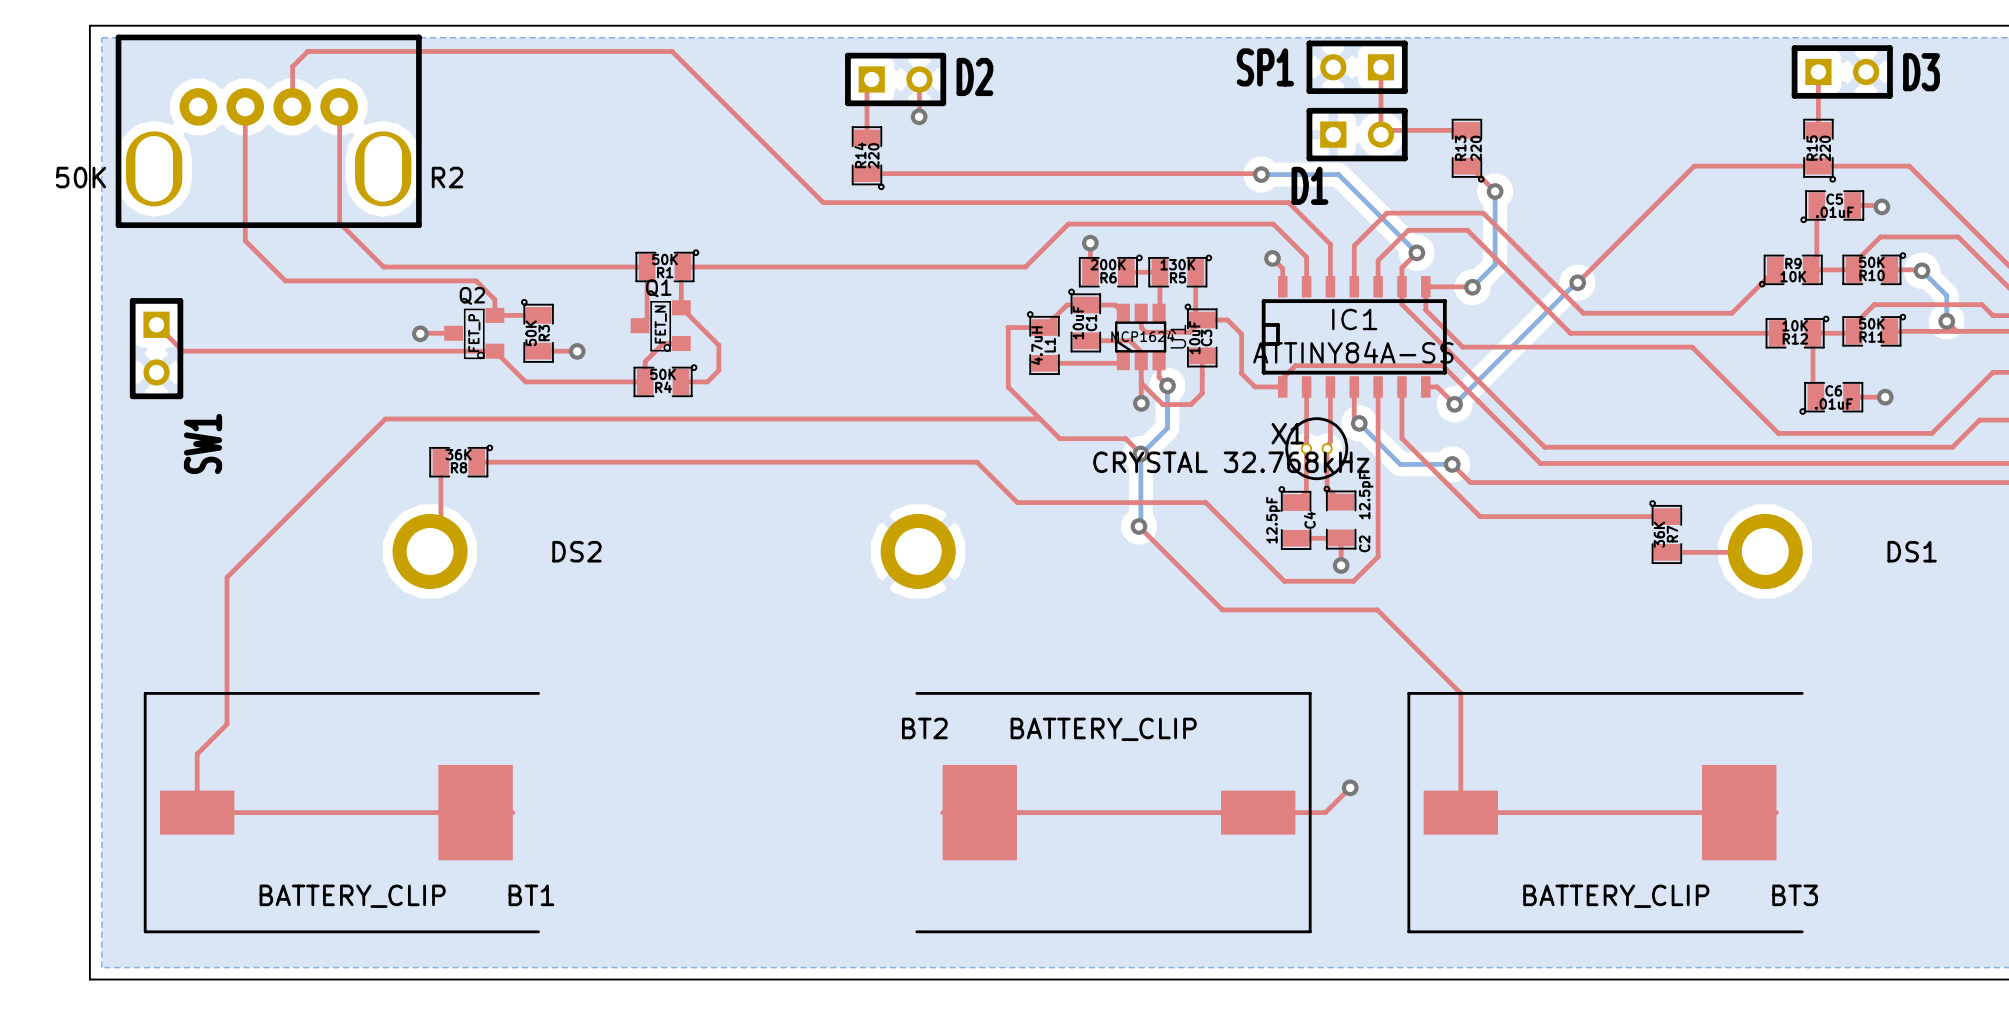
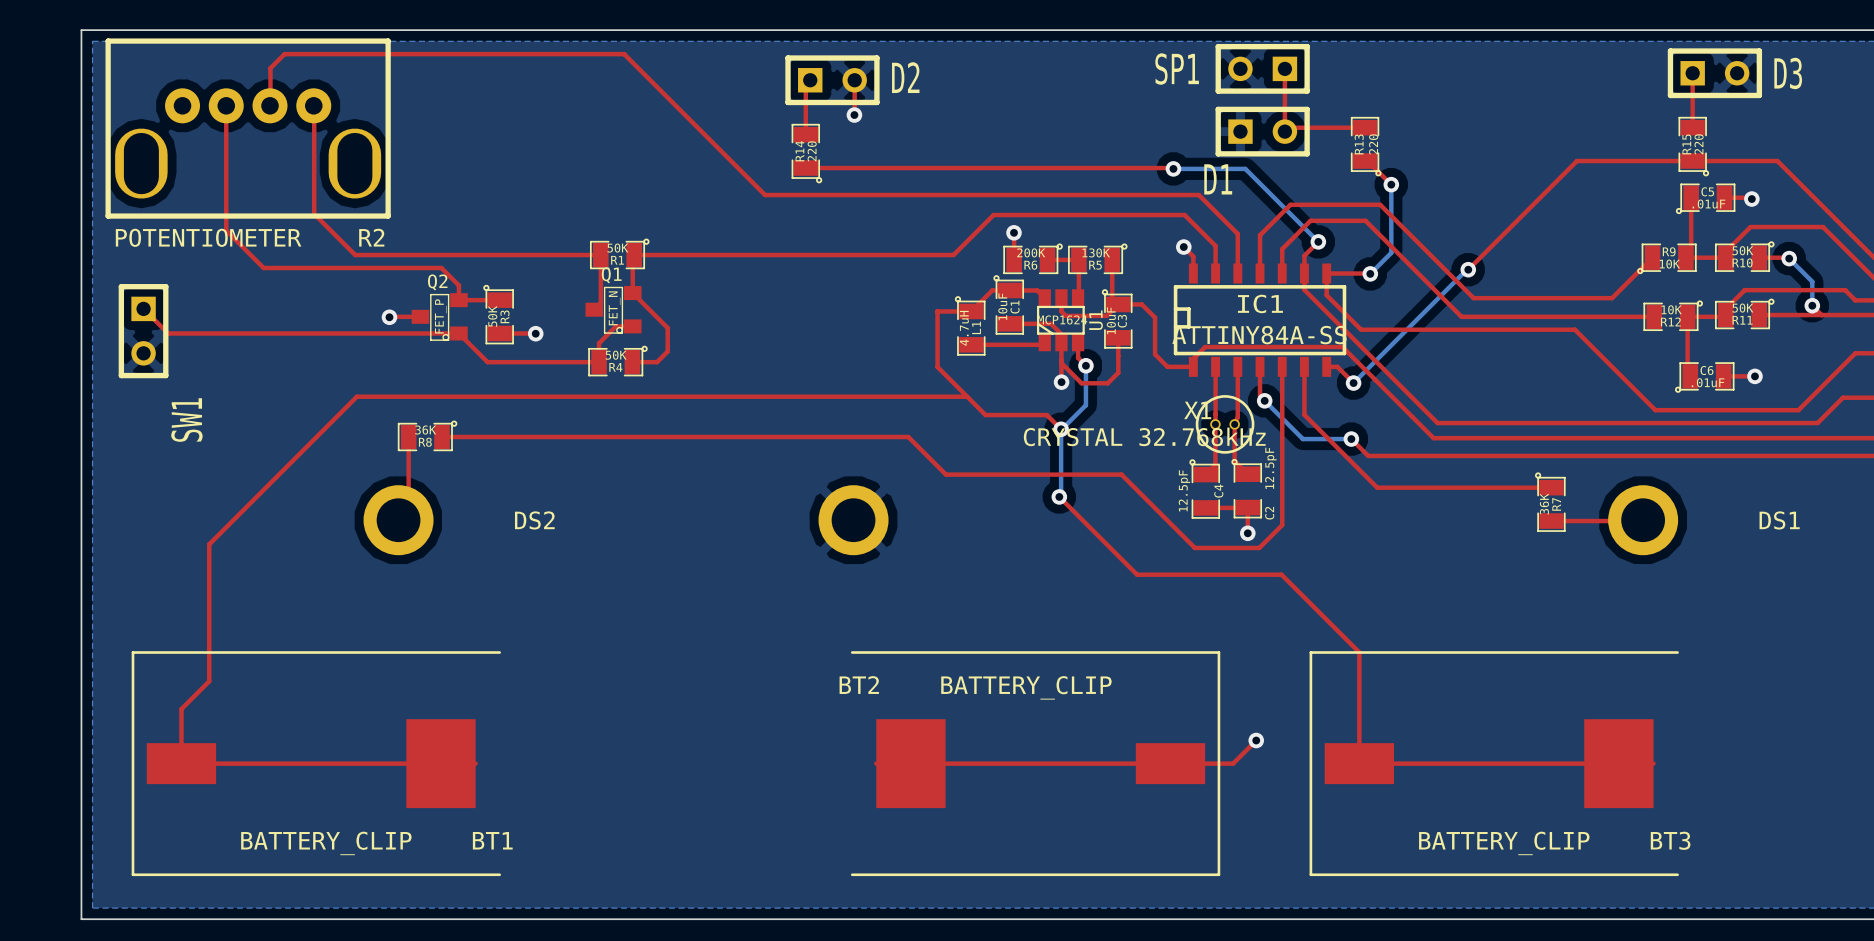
R2 value: 50K (80, 177) -> POTENTIOMETER (208, 237)
R2 name position: R2 (447, 177) -> R2 (371, 237)

